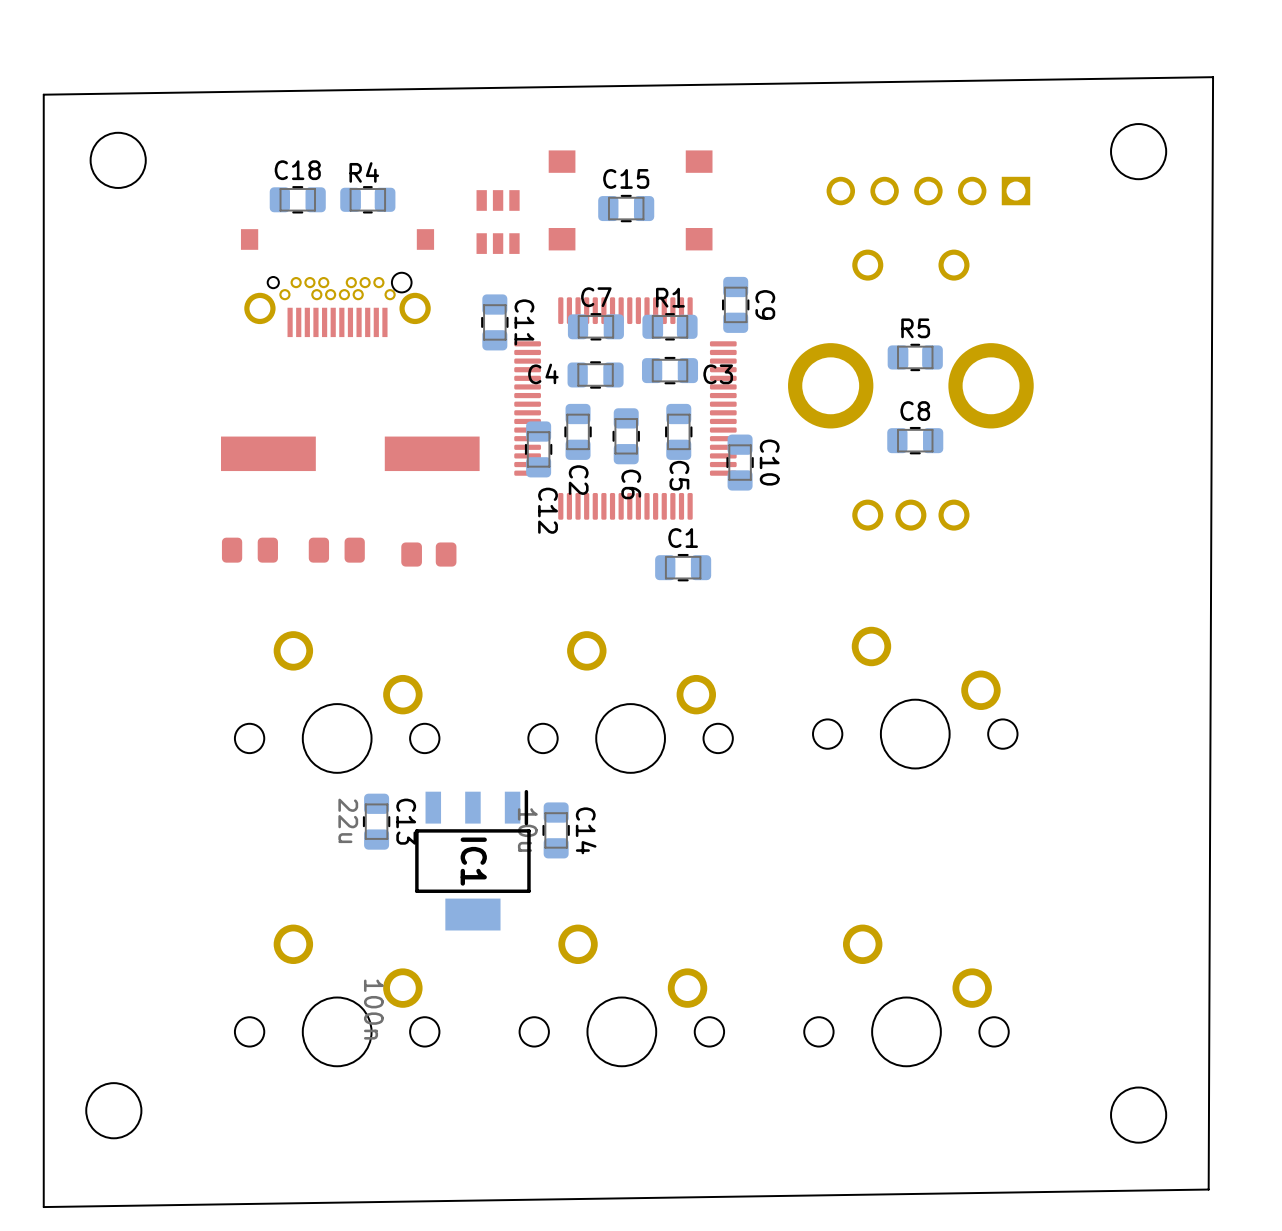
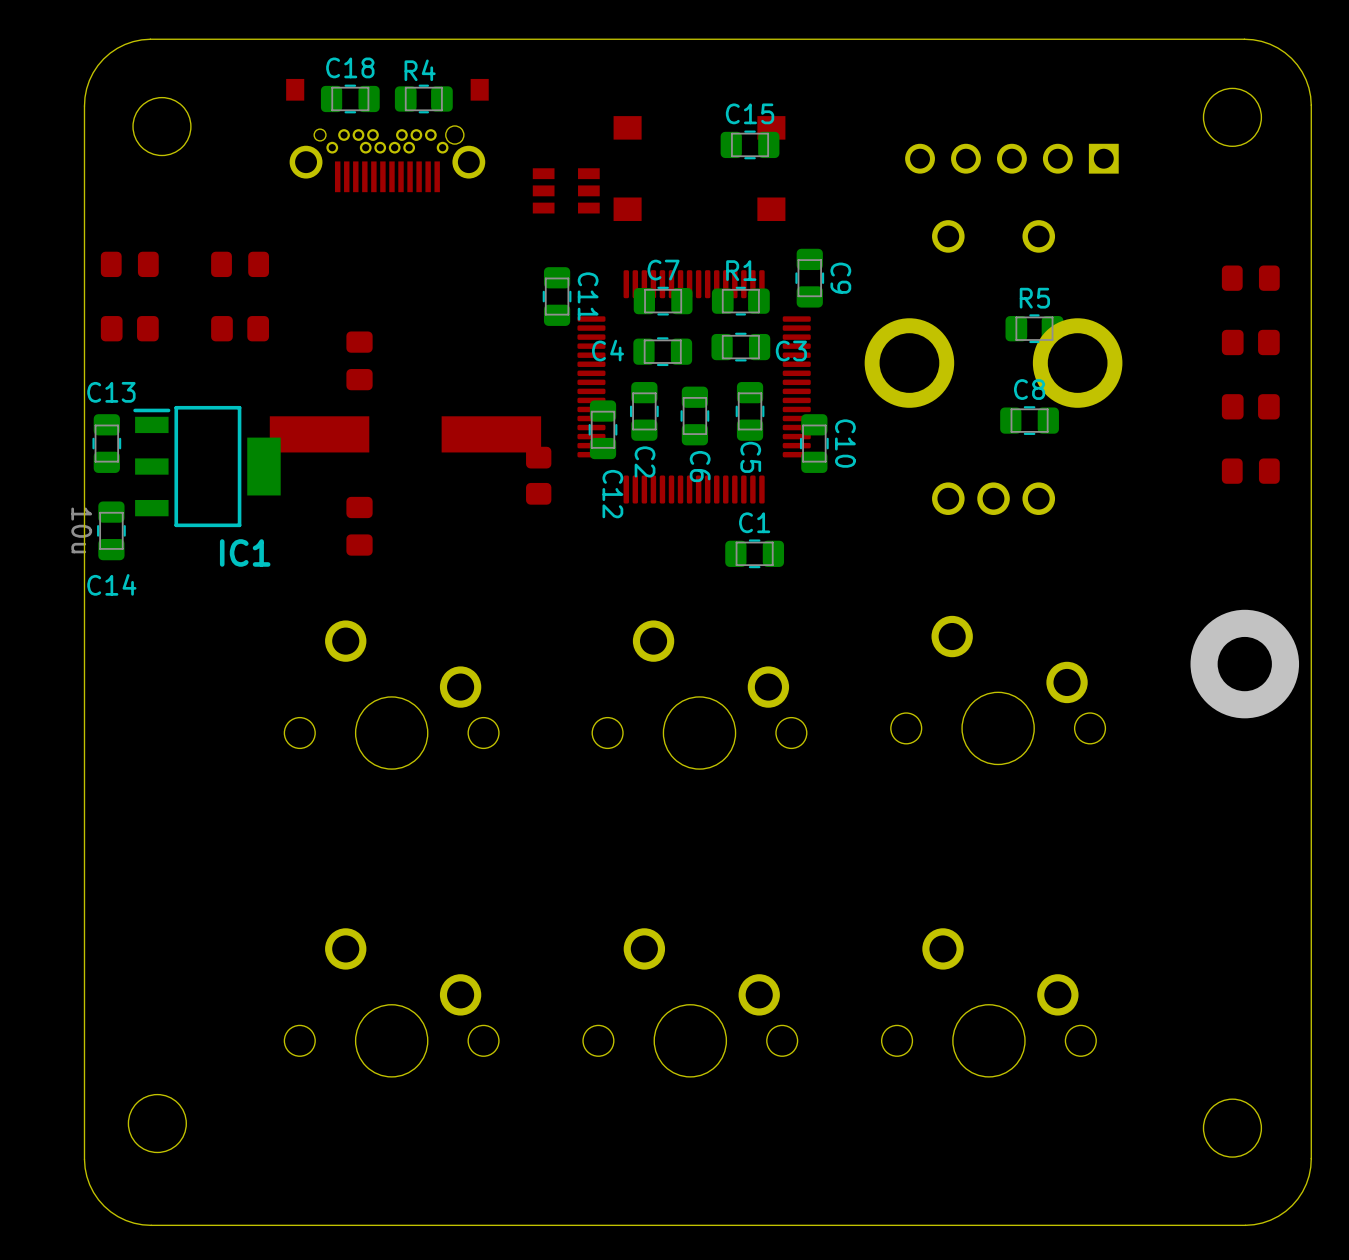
board edge: (1213, 77) (43, 94) (43, 1207) (1208, 1189) (1213, 77) -> (1244, 39) (1269, 44) (1291, 58) (1306, 79) (1311, 105) (1311, 1158) (1306, 1183) (1292, 1205) (1270, 1220) (1245, 1225) (151, 1225) (125, 1220) (104, 1206) (89, 1184) (84, 1159) (84, 106) (89, 80) (103, 59) (125, 44) (150, 39) (1244, 39)
part: none -> (387, 135)
C18 position: (297, 199) -> (350, 98)
R4 position: (367, 199) -> (423, 98)
C15 position: (626, 208) -> (750, 144)
part rotation: 0° (498, 222) -> 90° clockwise (566, 190)
part: (337, 283) -> none
part: none -> (129, 264)
part: none -> (240, 264)
part: none -> (1250, 278)
part: none -> (129, 328)
part: none -> (240, 328)
R5 position: (915, 357) -> (1034, 328)
part: none -> (1250, 342)
part: none -> (359, 360)
part: none -> (1250, 406)
C8 position: (915, 440) -> (1029, 420)
part: none -> (1250, 471)
part: none -> (359, 526)
part: (249, 550) -> none
part: (336, 550) -> none
part rotation: 0° (428, 554) -> 90° clockwise (538, 475)
part position: (428, 554) -> (538, 475)
via: none -> (1244, 664)
C13 value: 22u (348, 820) -> none
C13 position: (376, 821) -> (106, 443)
C13 name rotation: 0° (406, 821) -> 90° counterclockwise (111, 392)
C14 position: (556, 830) -> (111, 530)
C14 name rotation: 0° (586, 830) -> 90° counterclockwise (111, 584)
IC1 rotation: 0° (472, 860) -> 90° counterclockwise (206, 466)
IC1 position: (472, 860) -> (206, 466)
IC1 name position: IC1 (473, 861) -> IC1 (245, 552)
C2 value: 100n (373, 1009) -> none

